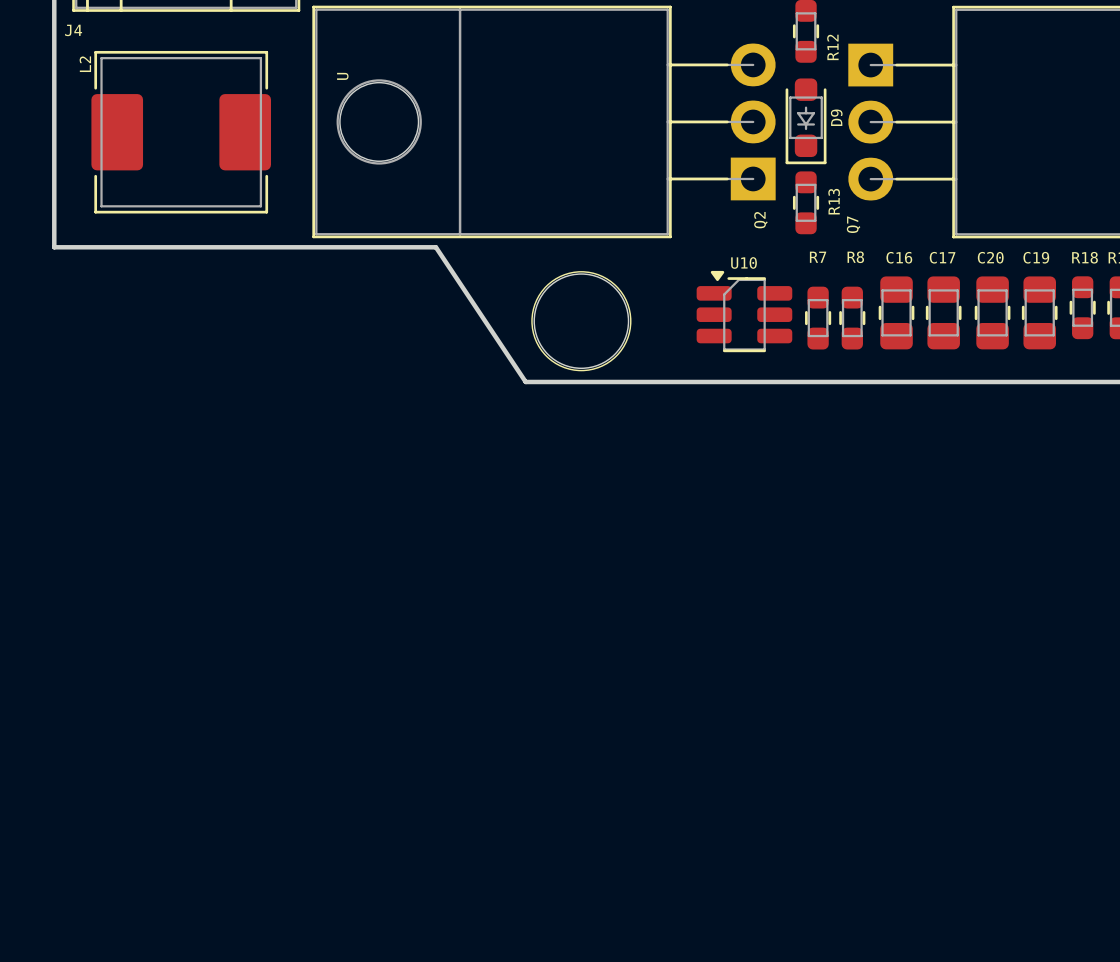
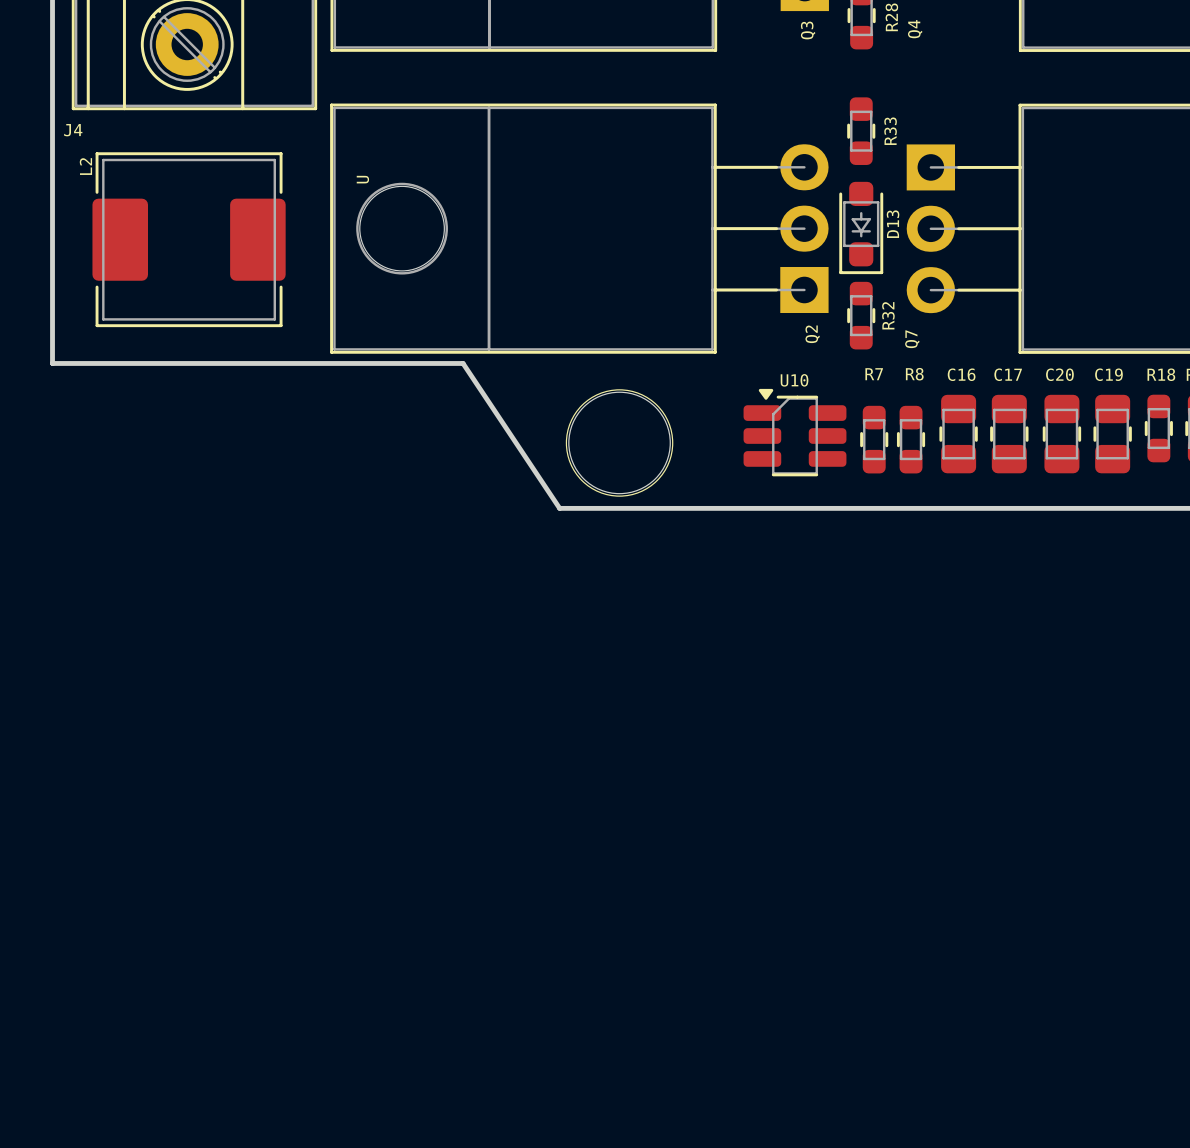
R12 name: R12 (832, 47) -> R33 (890, 131)
D9 name: D9 (836, 117) -> D13 (893, 224)
R13 name: R13 (834, 201) -> R32 (888, 315)

